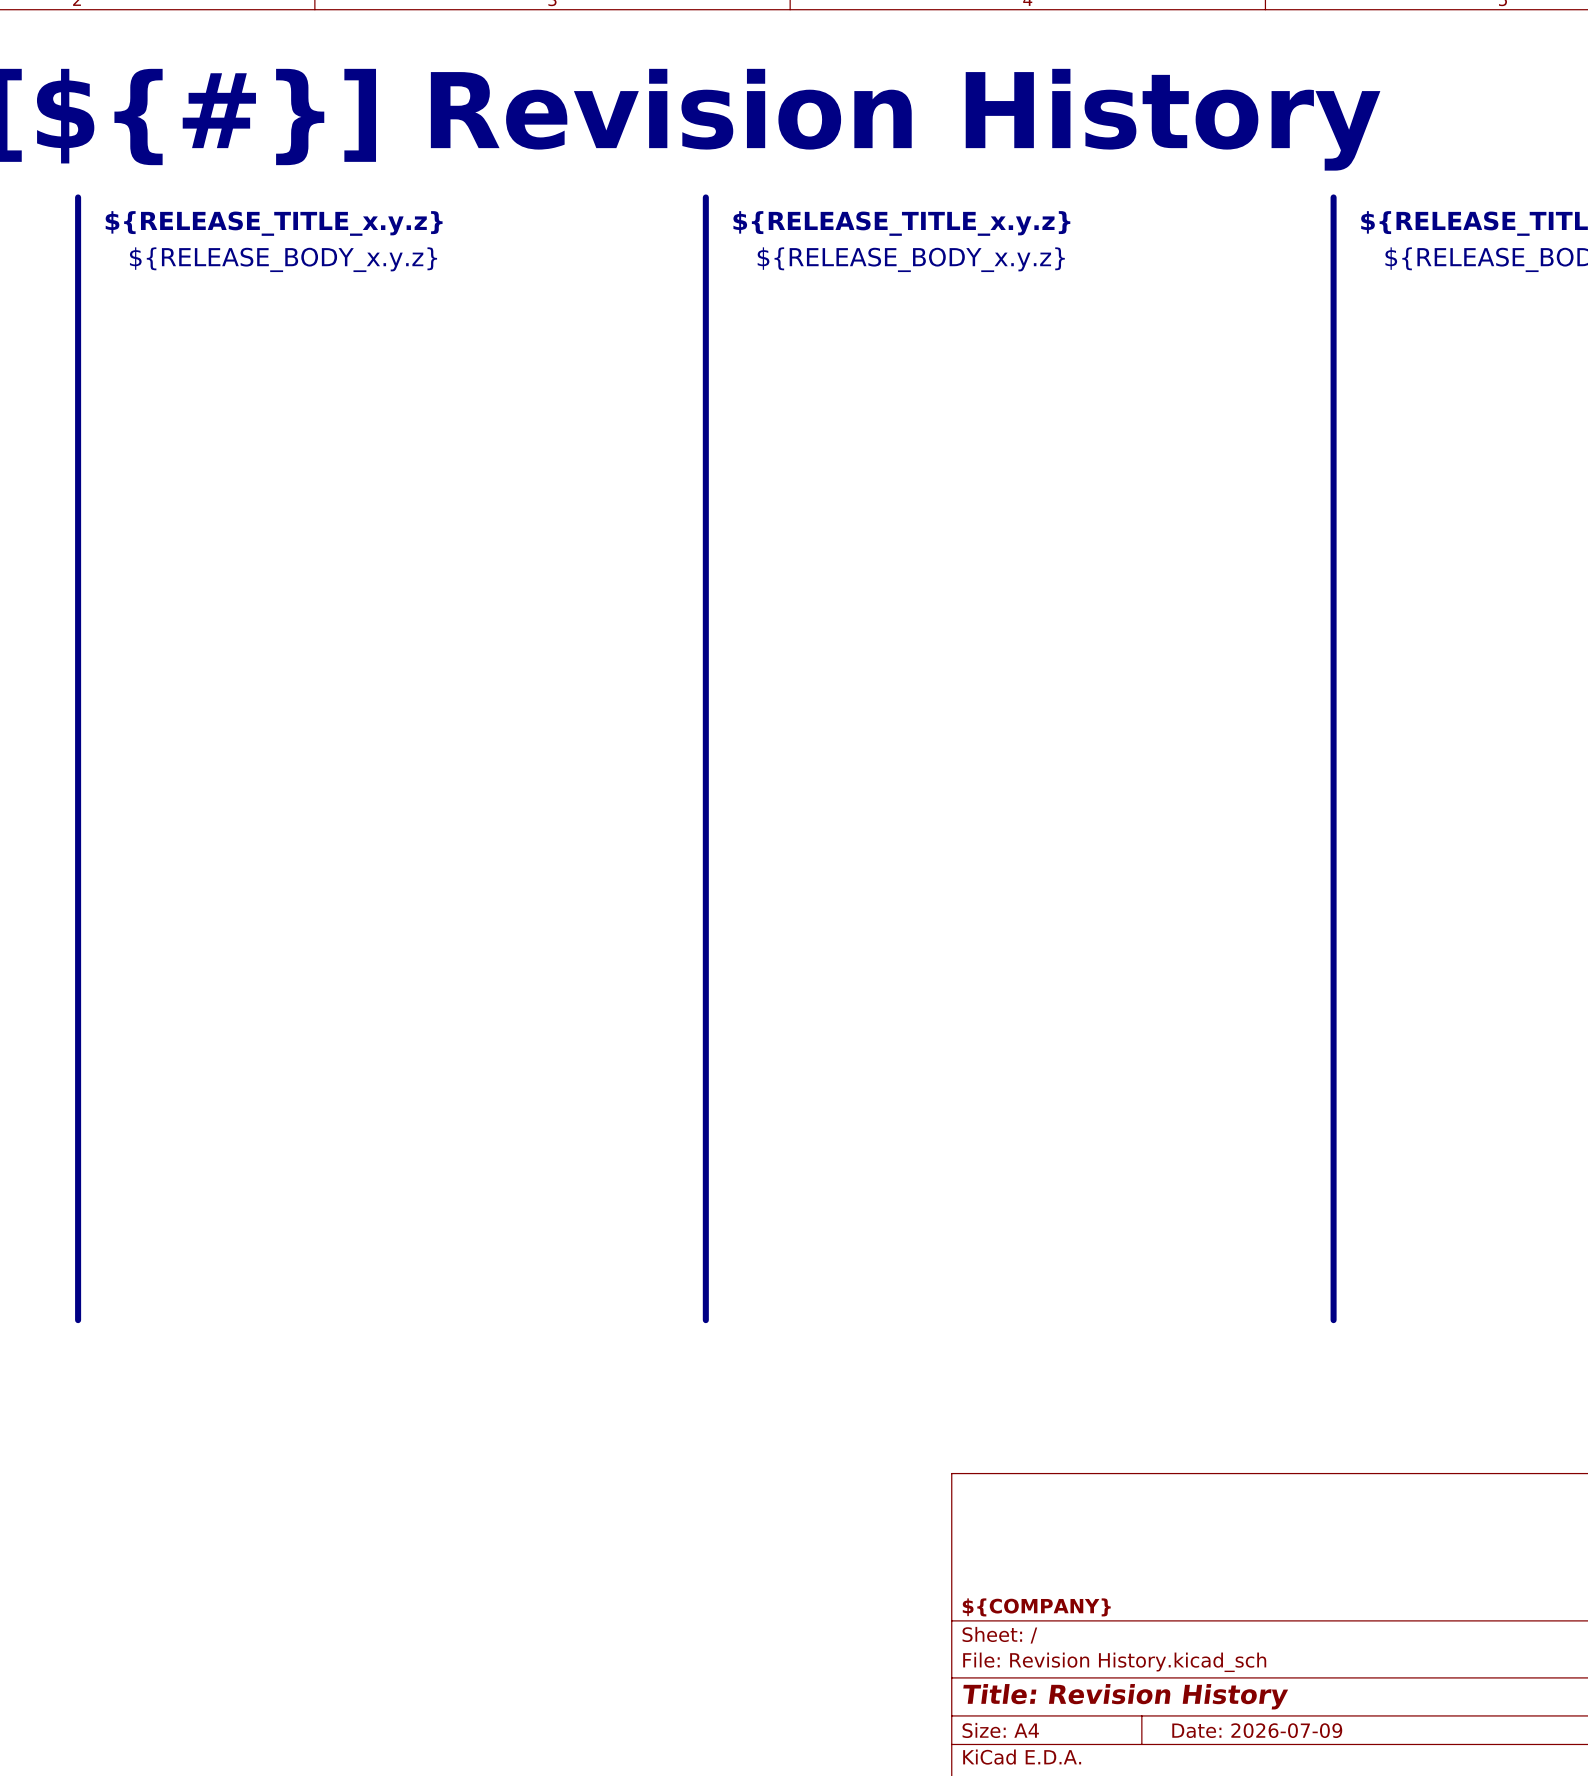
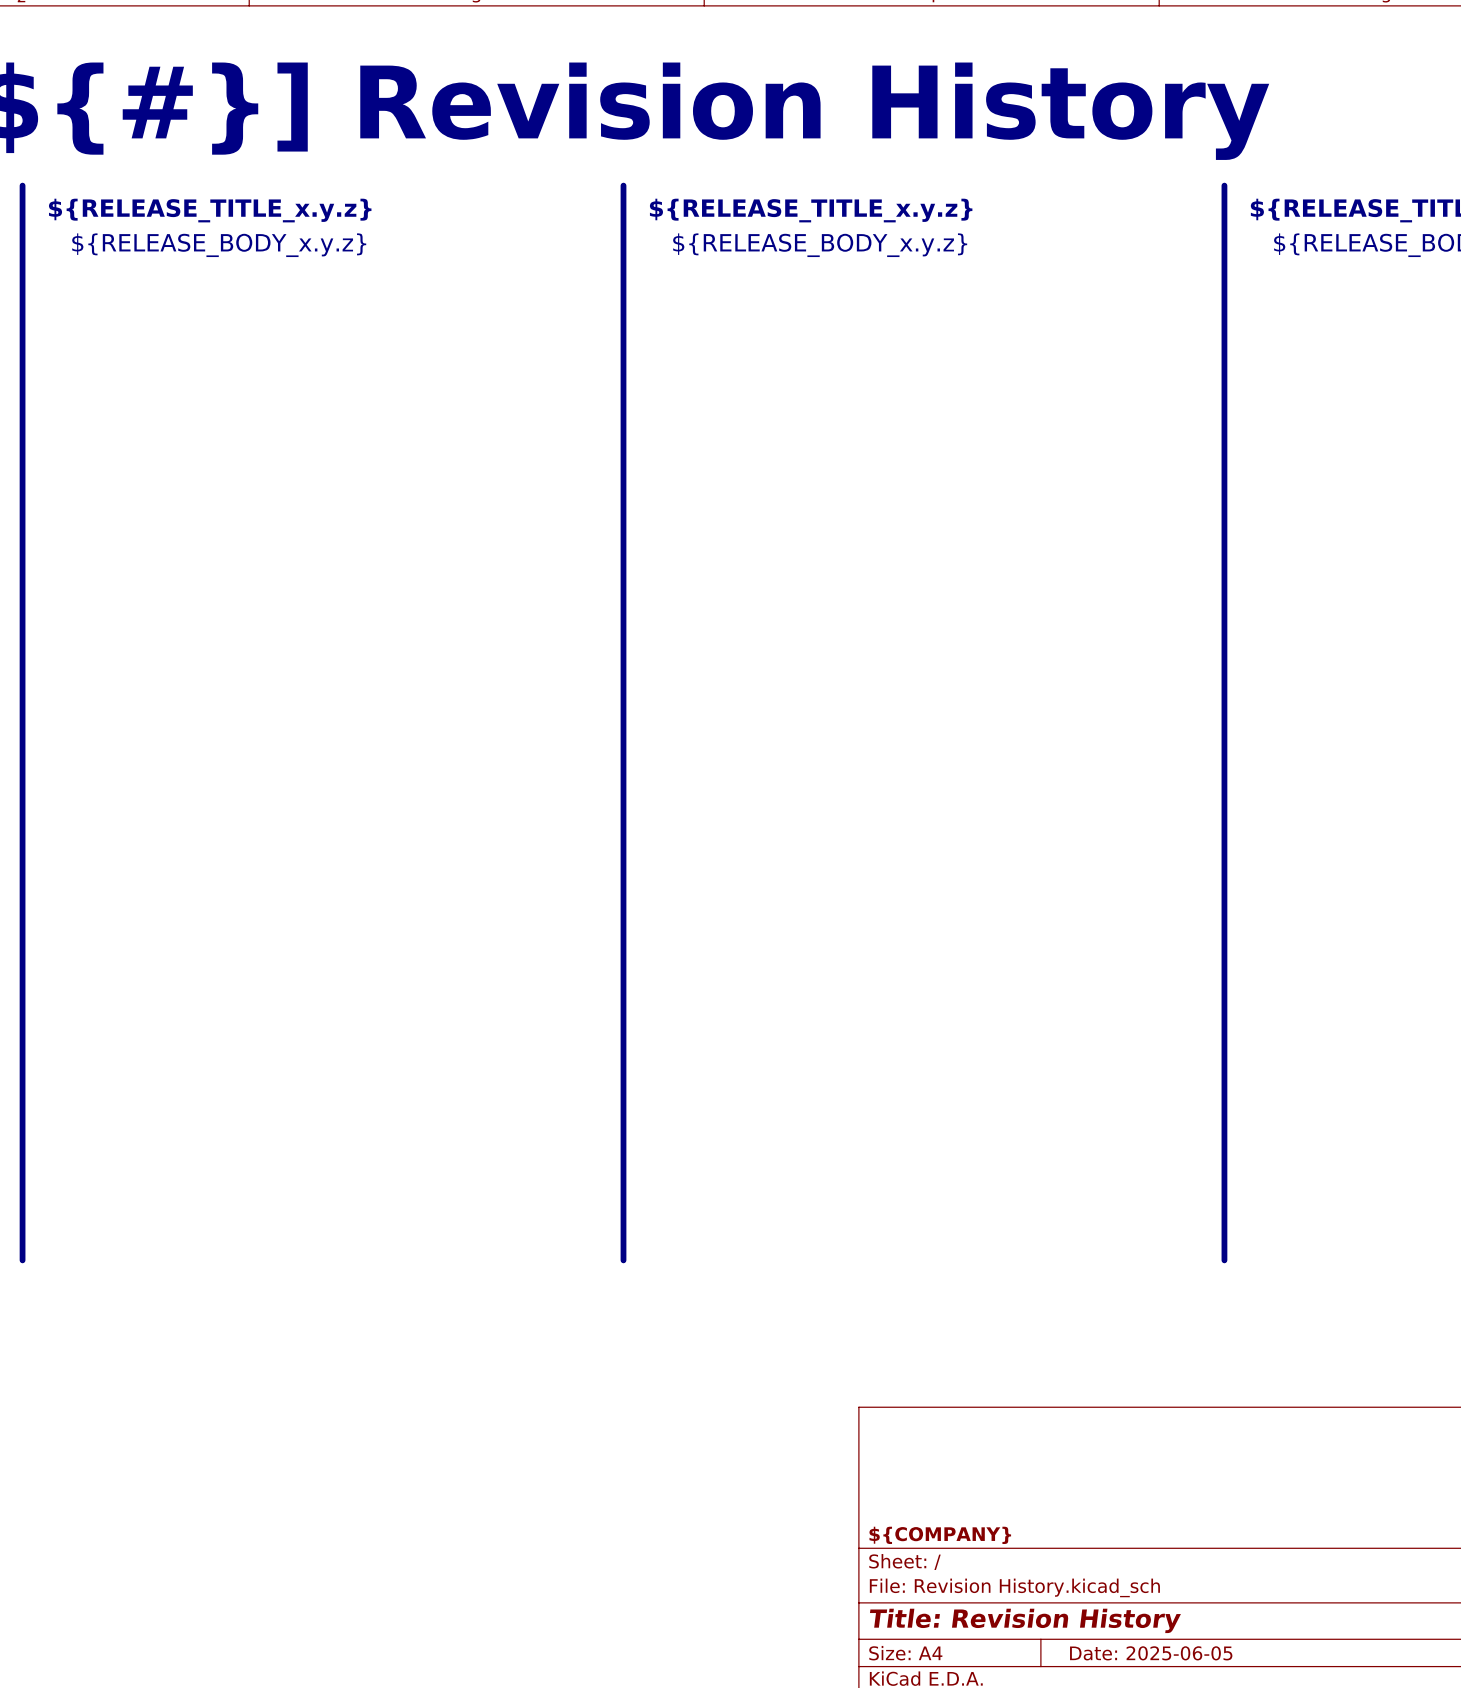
title block: Date: 2026-07-09 (1257, 1730) -> Date: 2025-06-05 (1151, 1653)

